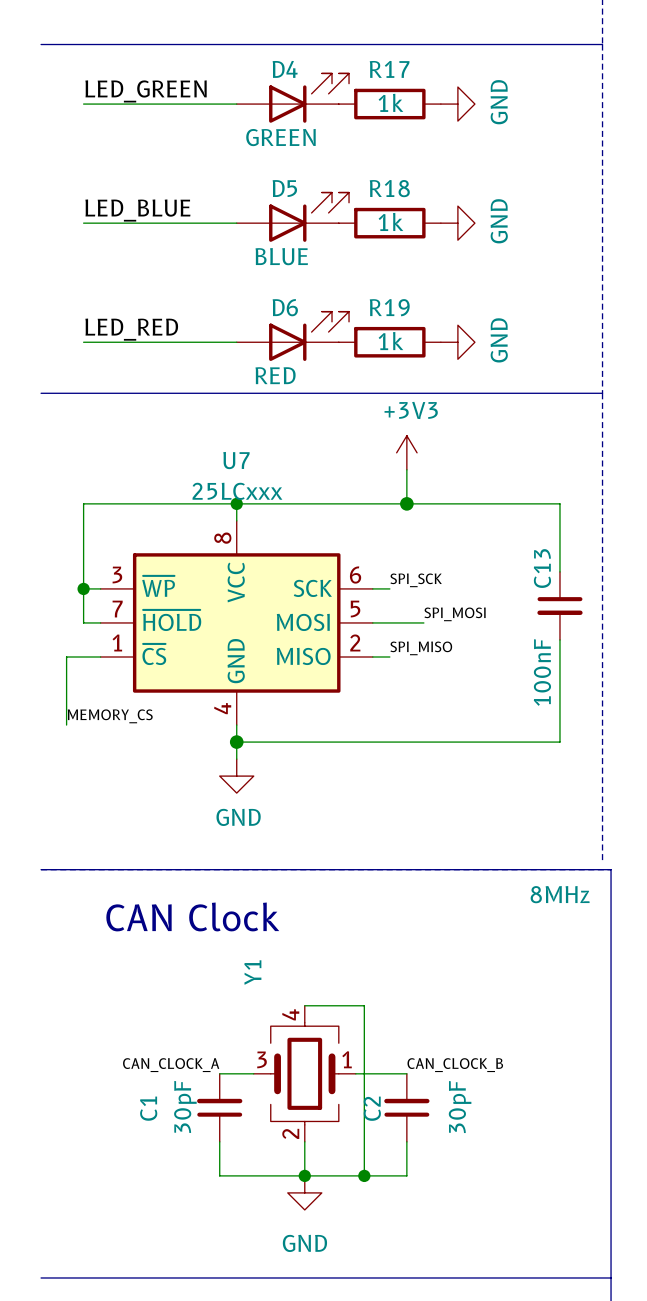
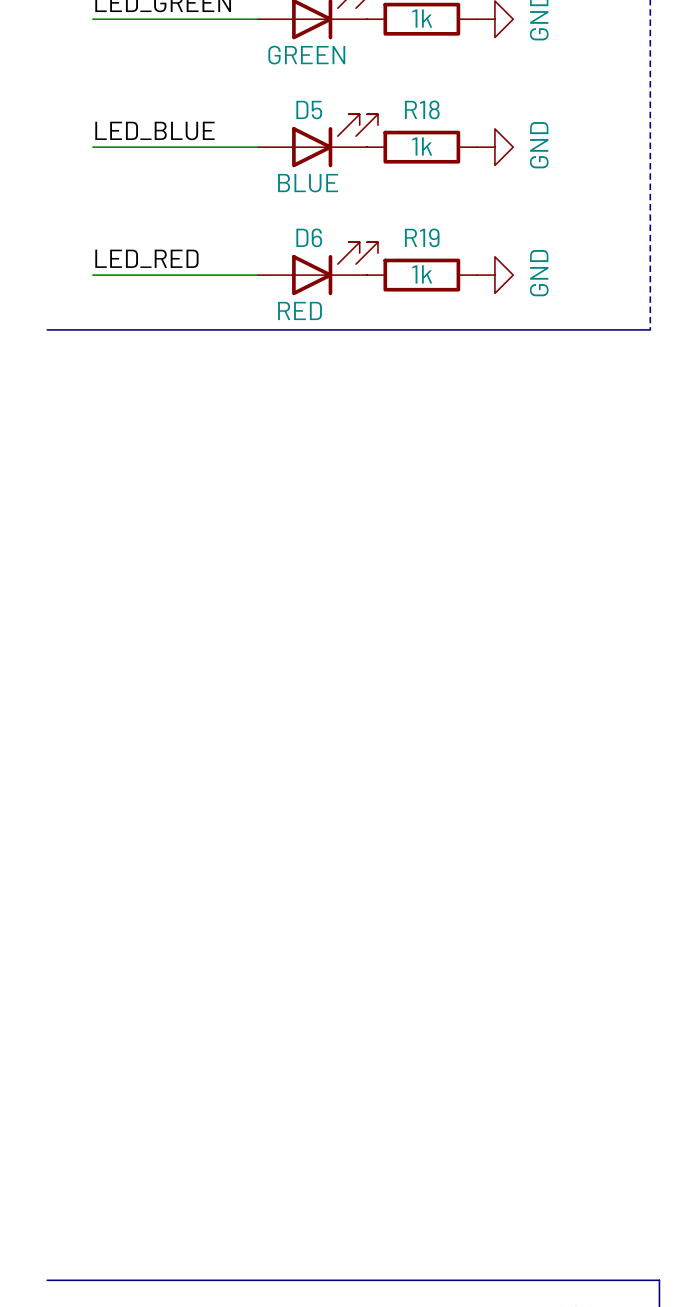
line: (602, 393) (602, 861) -> none
power symbol: +3V3 (406, 452) -> none
wire: (406, 469) (406, 503) -> none
wire: (236, 503) (236, 520) -> none
junction: (236, 503) -> none
junction: (406, 503) -> none
wire: (559, 571) (559, 503) (83, 503) (83, 622) (100, 622) -> none
label: SPI_SCK (416, 580) -> none
wire: (83, 588) (100, 588) -> none
junction: (83, 588) -> none
wire: (372, 588) (389, 588) -> none
C13: 100nF (559, 605) -> none
label: SPI_MOSI (455, 614) -> none
U7: 25LCxxx (236, 622) -> none
wire: (372, 622) (423, 622) -> none
wire: (559, 639) (559, 742) (236, 742) -> none
label: SPI_MISO (421, 648) -> none
wire: (100, 657) (66, 657) (66, 725) -> none
wire: (372, 657) (389, 657) -> none
label: MEMORY_CS (110, 716) -> none
wire: (236, 725) (236, 759) -> none
junction: (236, 742) -> none
power symbol: GND (236, 776) -> none
line: (611, 869) (611, 1277) -> none
line: (611, 869) (41, 869) (611, 869) -> none
text: CAN Clock (192, 916) -> none
wire: (304, 1005) (364, 1005) (364, 1175) -> none
label: CAN_CLOCK_A (171, 1065) -> none
label: CAN_CLOCK_B (455, 1065) -> none
wire: (219, 1073) (253, 1073) -> none
Y1: 8MHz (304, 1073) -> none
wire: (355, 1073) (406, 1073) -> none
C1: 30pF (219, 1107) -> none
C2: 30pF (406, 1107) -> none
wire: (219, 1141) (219, 1175) (406, 1175) (406, 1141) -> none
wire: (304, 1141) (304, 1175) -> none
junction: (304, 1175) -> none
junction: (364, 1175) -> none
power symbol: GND (304, 1192) -> none

